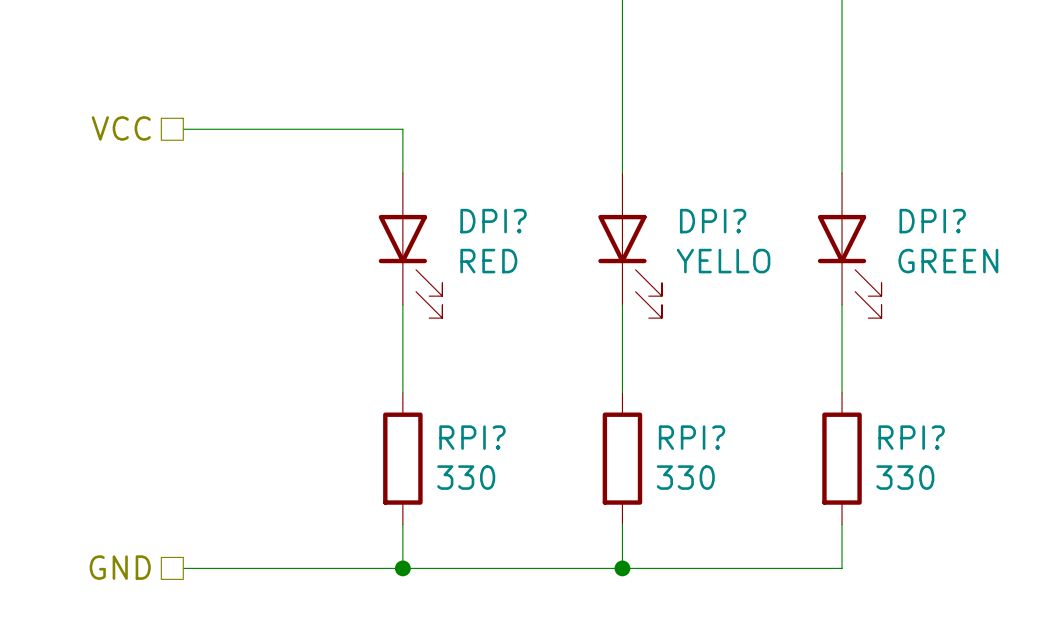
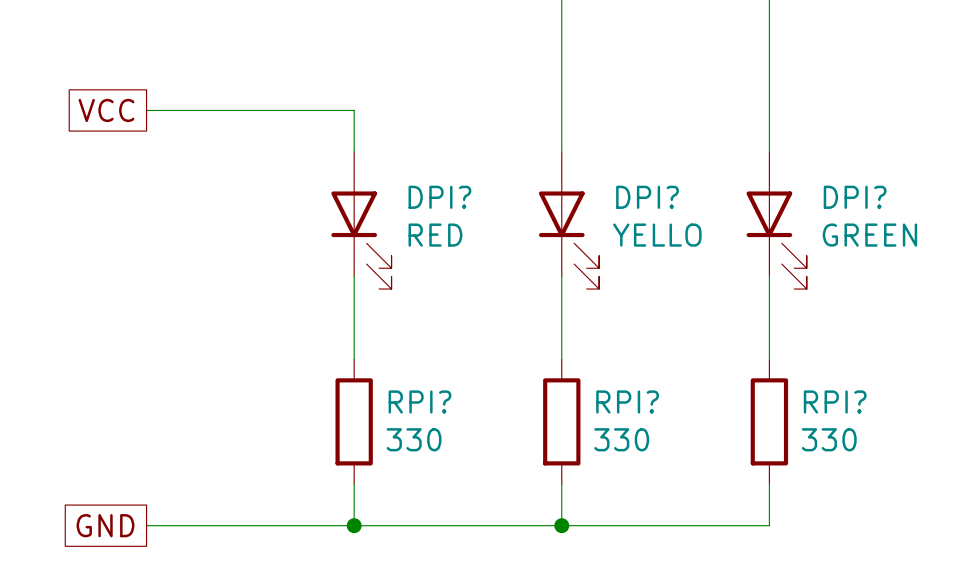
hierarchical label: VCC (121, 128) -> none
global label: none -> VCC (106, 110)
hierarchical label: GND (120, 567) -> none
global label: none -> GND (105, 525)

